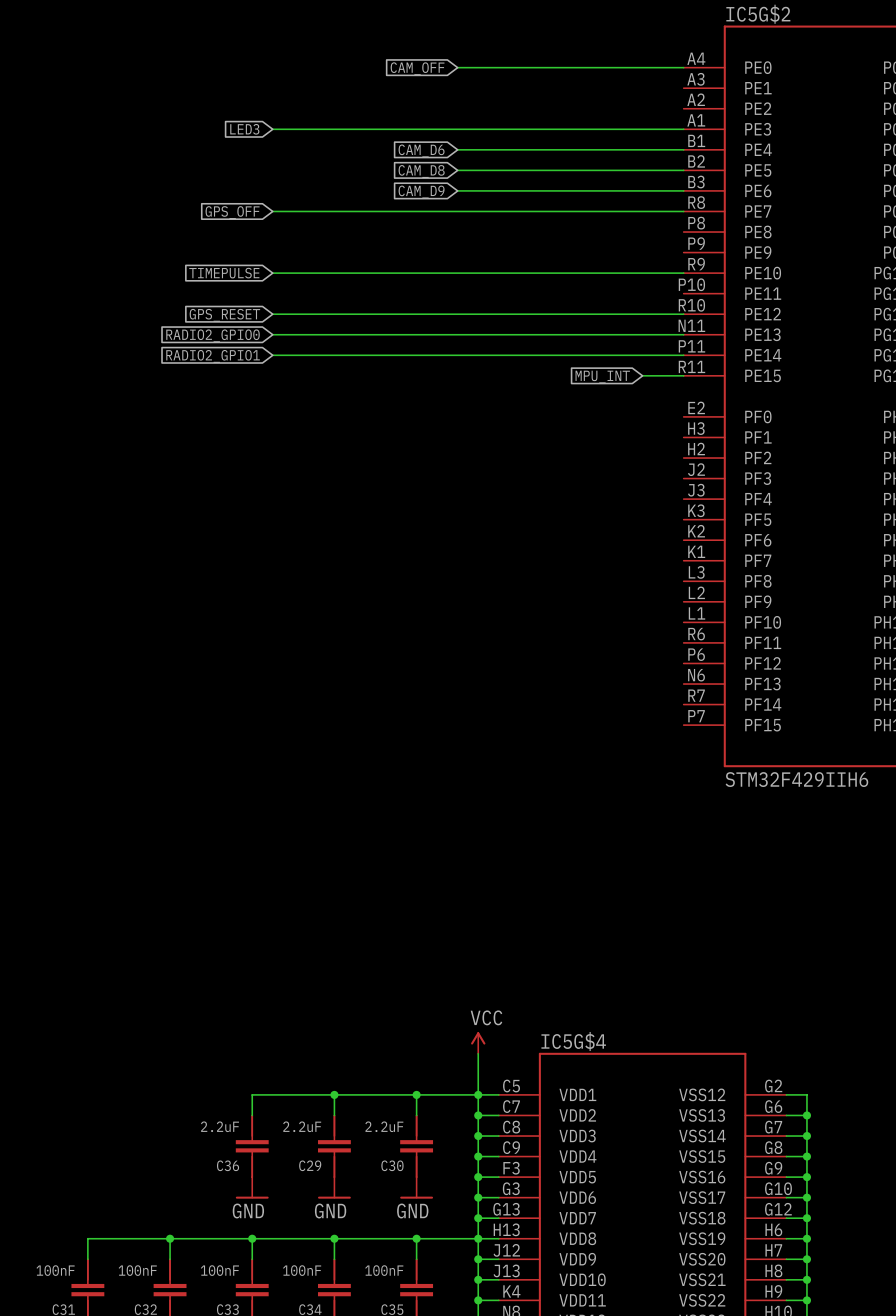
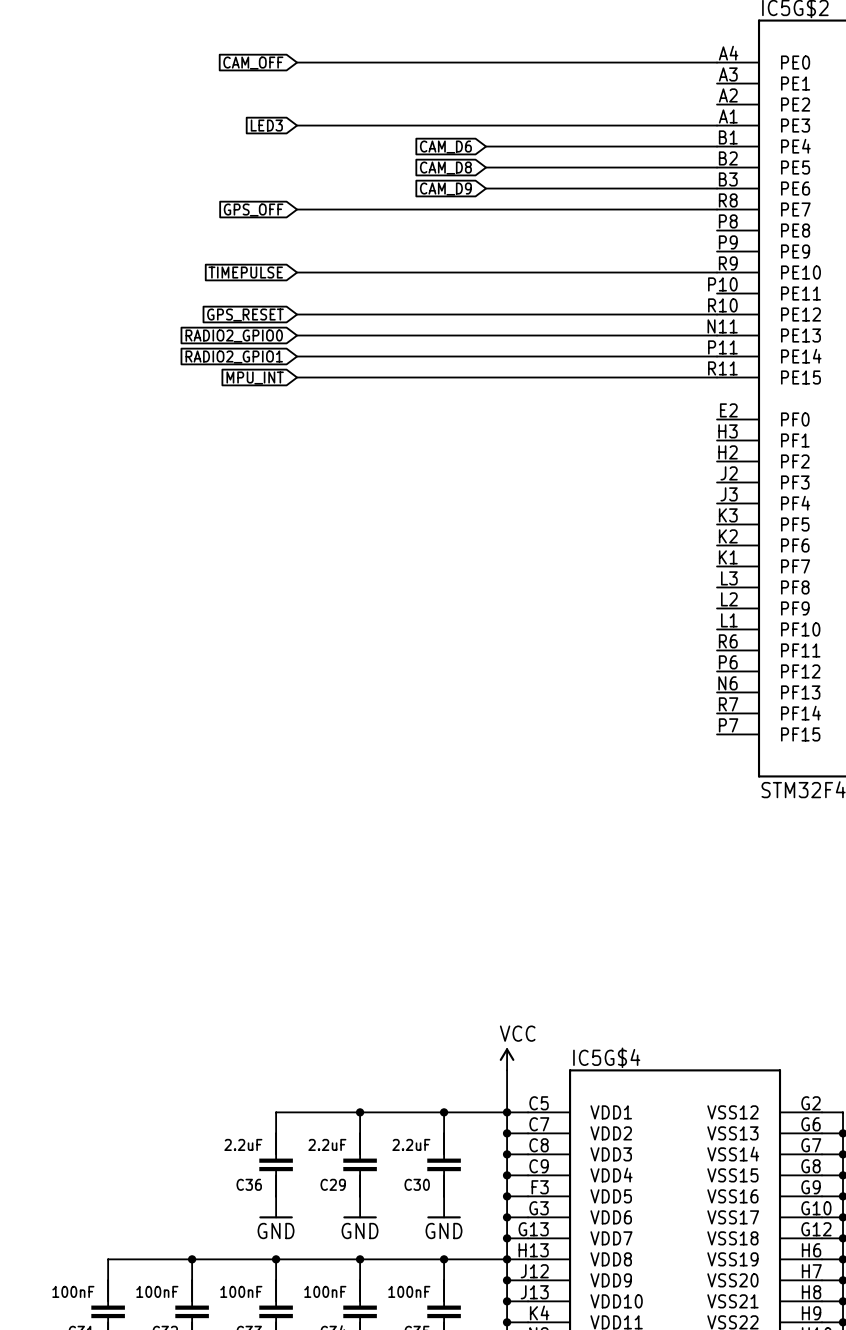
wire: none -> (297, 62) (486, 62)
global label position: CAM_OFF (417, 68) -> CAM_OFF (253, 63)
wire: none -> (297, 377) (675, 377)
global label: none -> MPU_INT (255, 378)
global label: MPU_INT (602, 377) -> none

